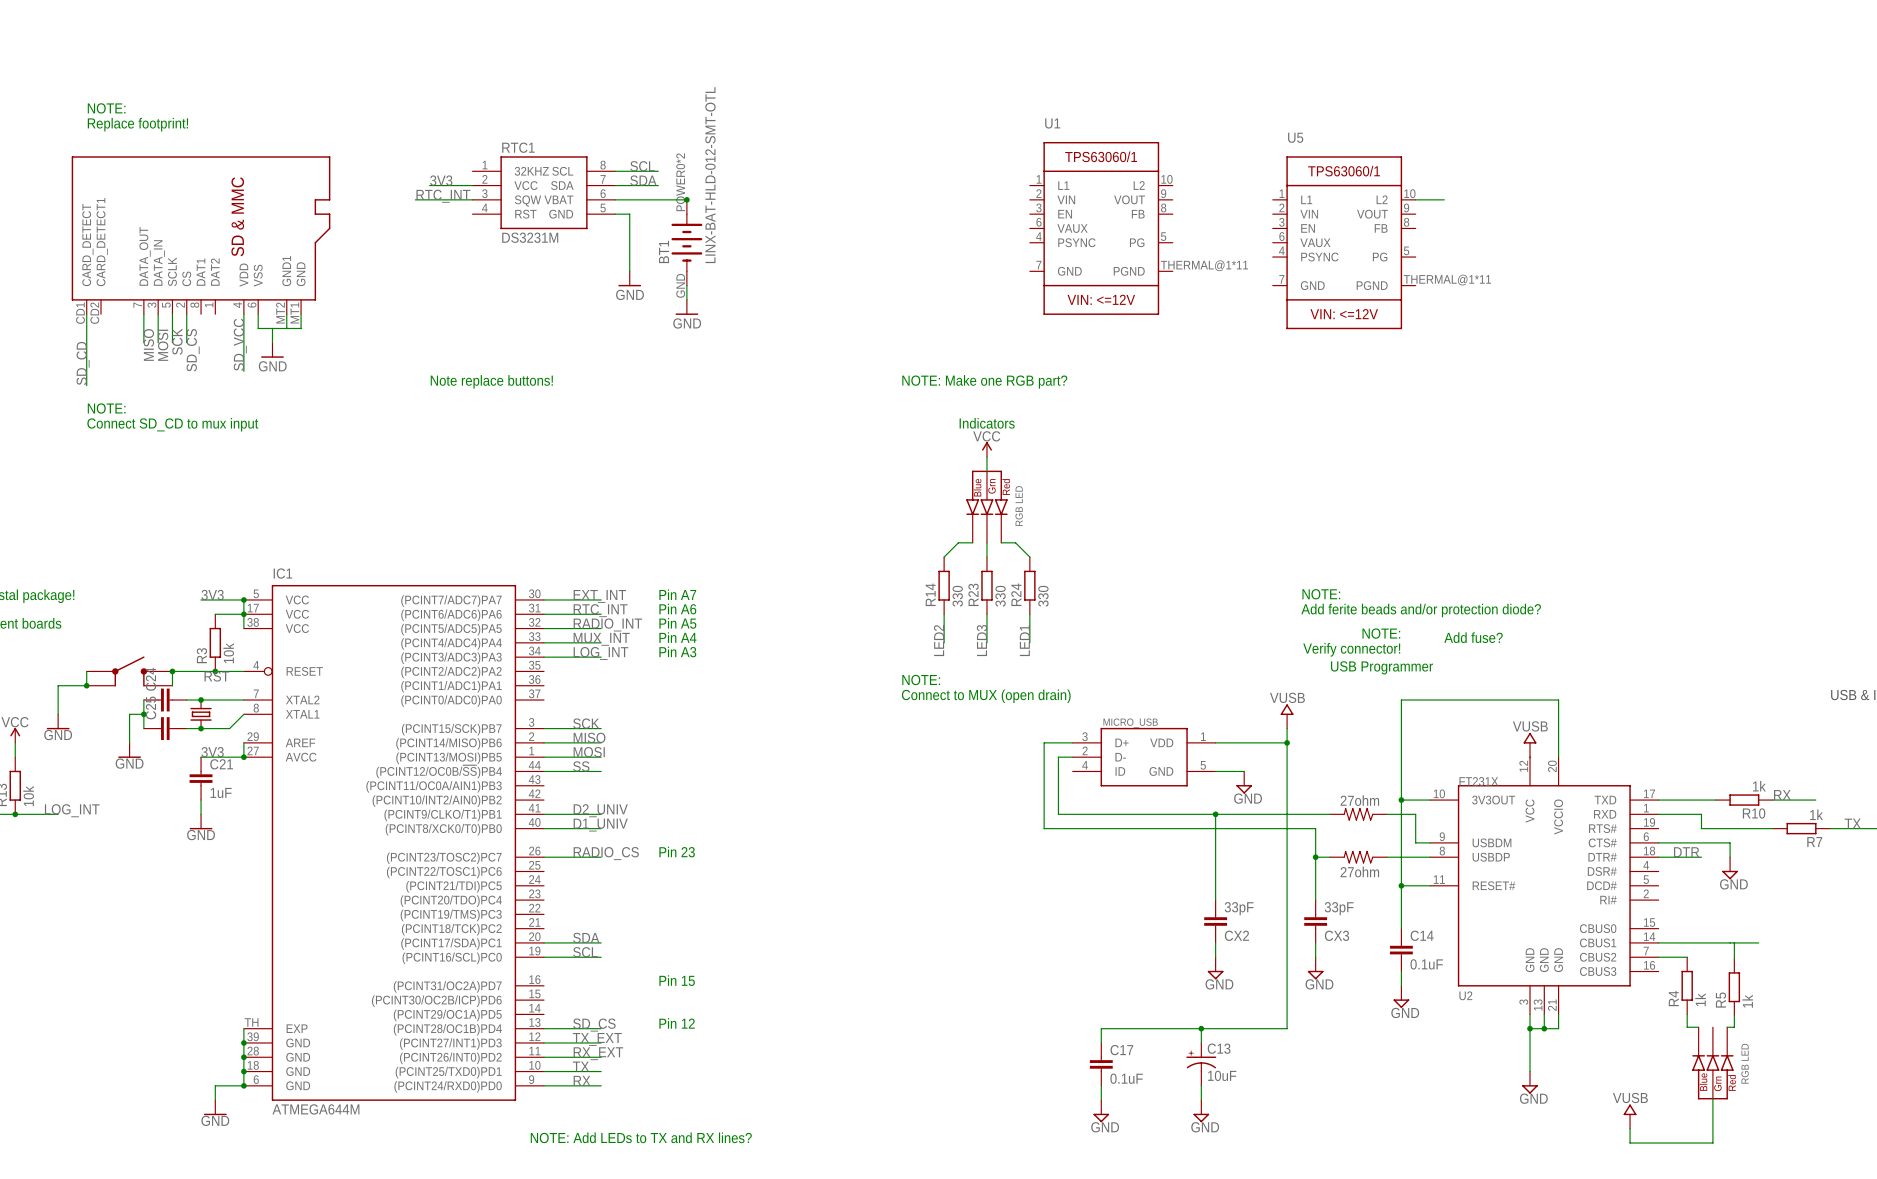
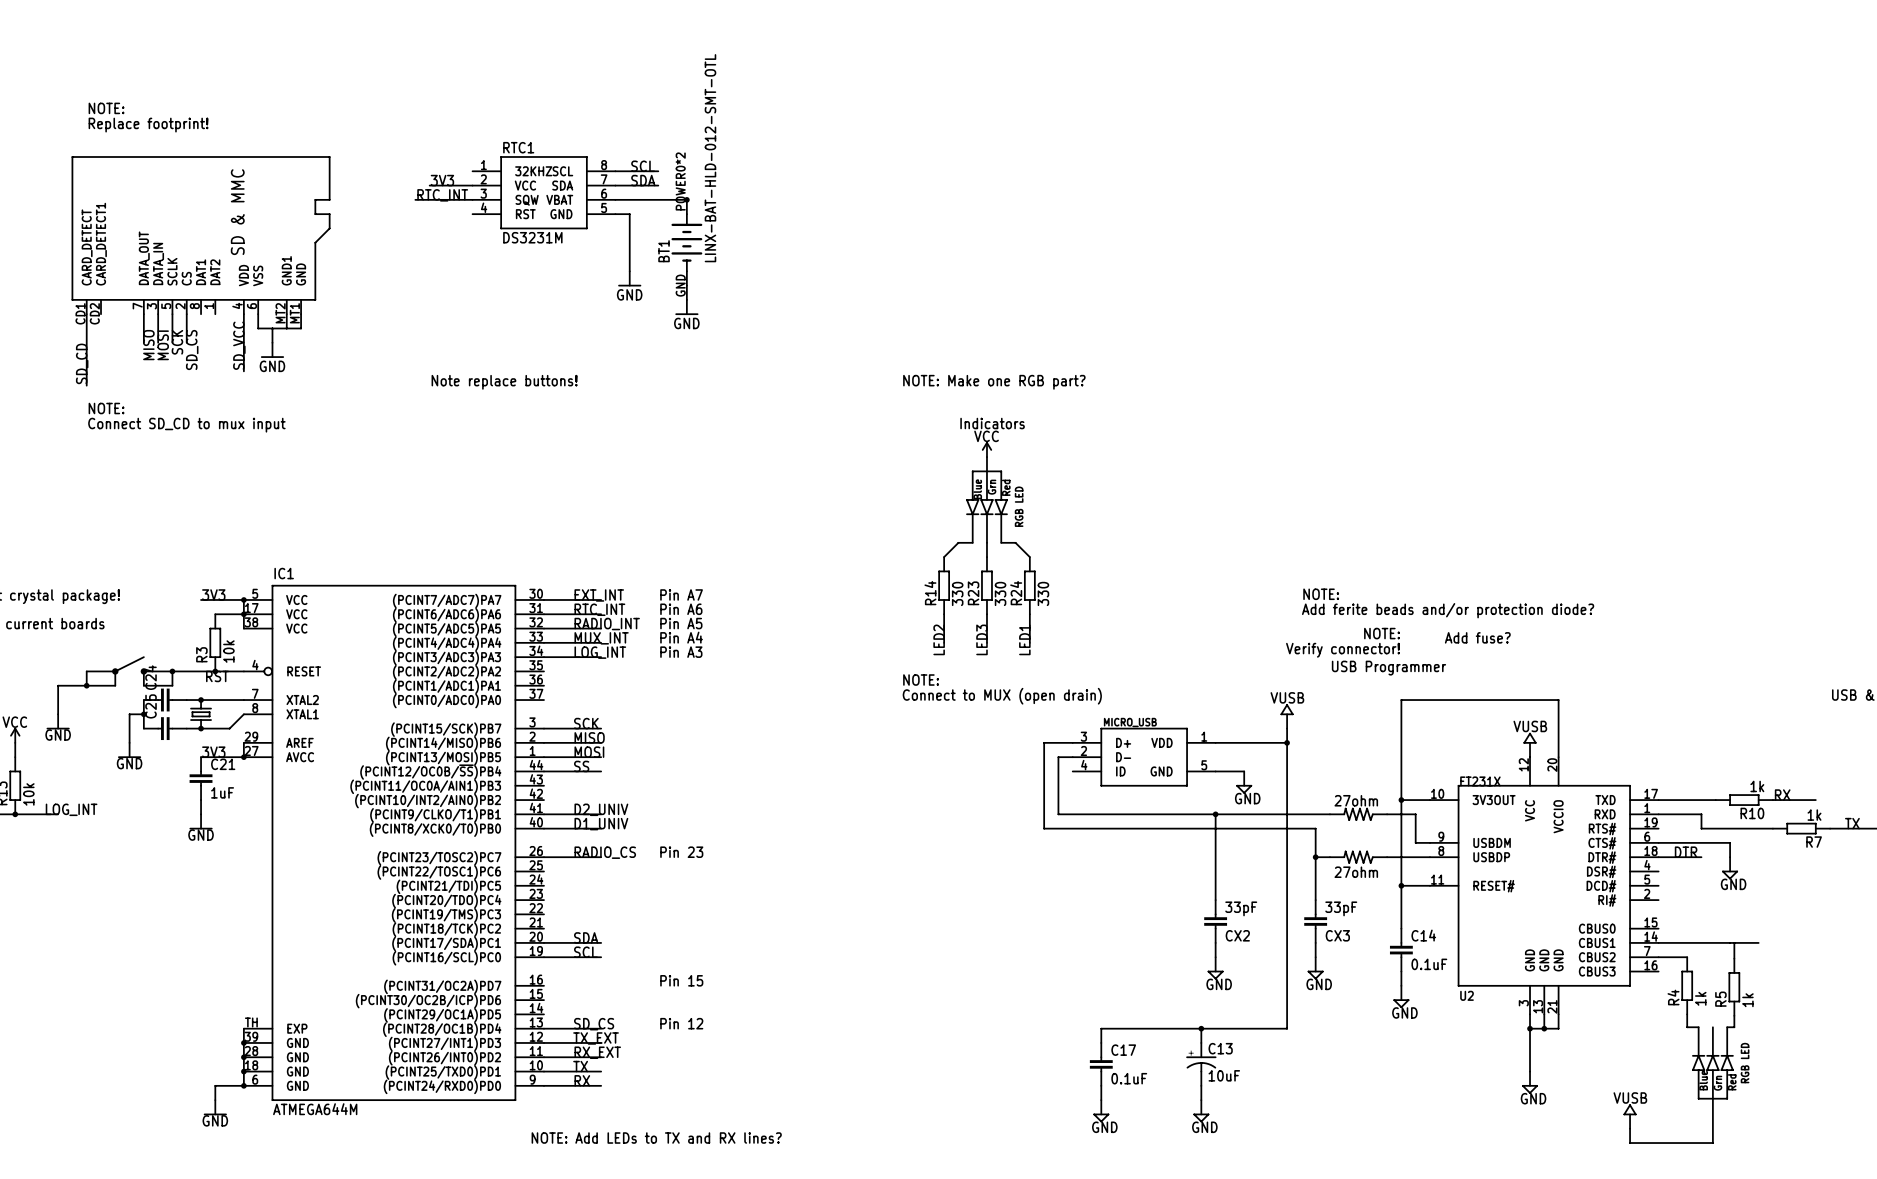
wire: (1415, 199) (1444, 199) -> none
U1: (1101, 228) -> none
U5: (1344, 242) -> none

